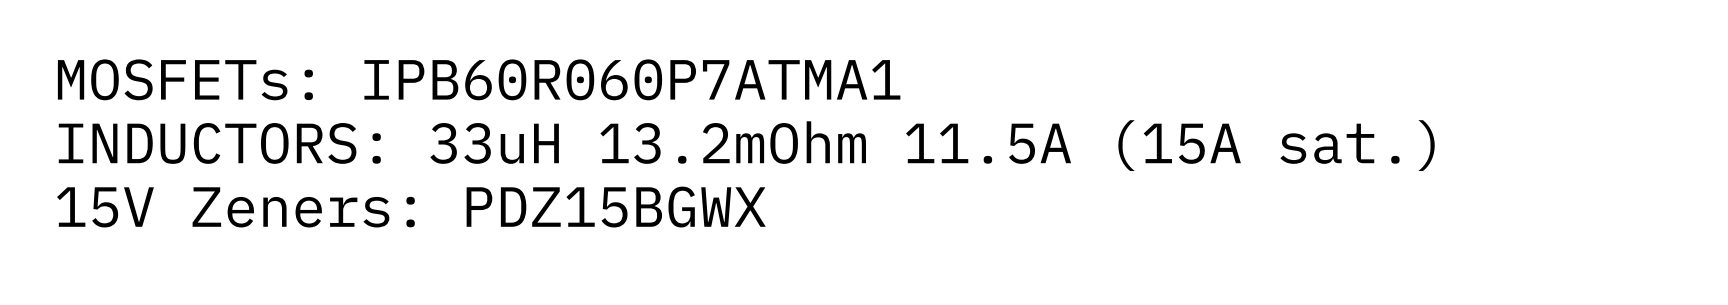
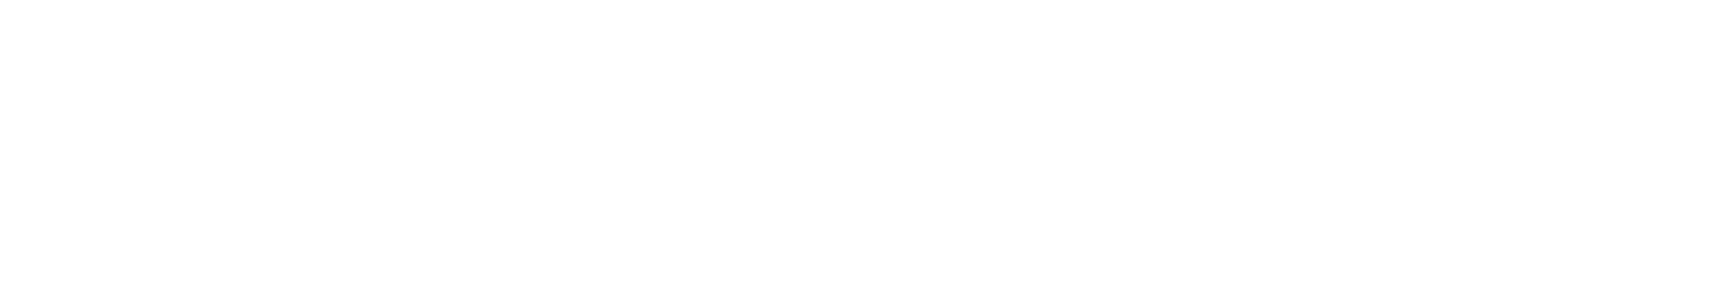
text: MOSFETs: IPB60R060P7ATMA1 (479, 79) -> none
text: INDUCTORS: 33uH 13.2mOhm 11.5A (15A sat.) (746, 145) -> none
text: 15V Zeners: PDZ15BGWX (411, 207) -> none

